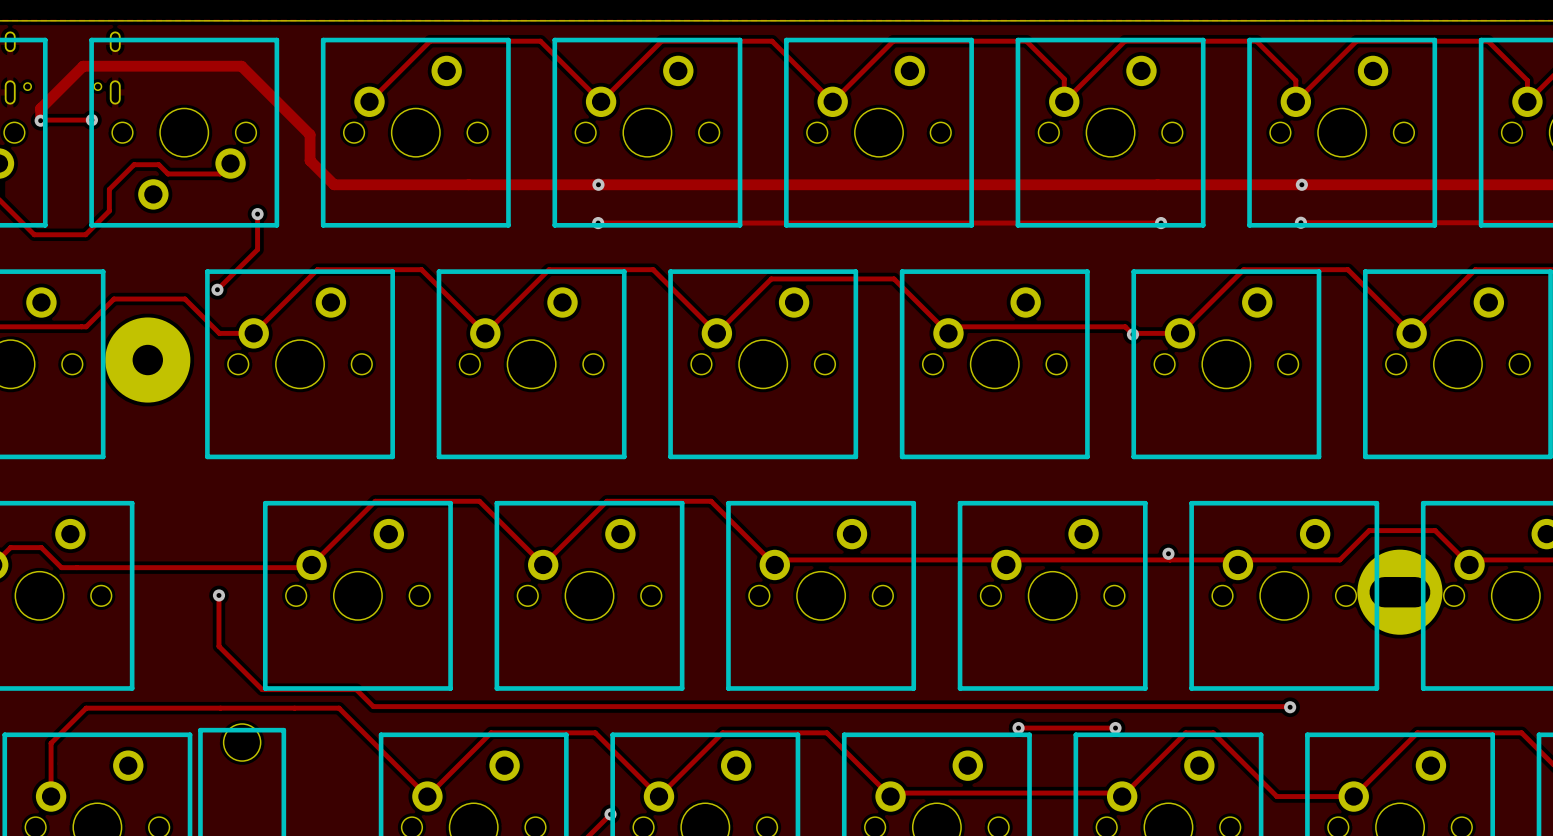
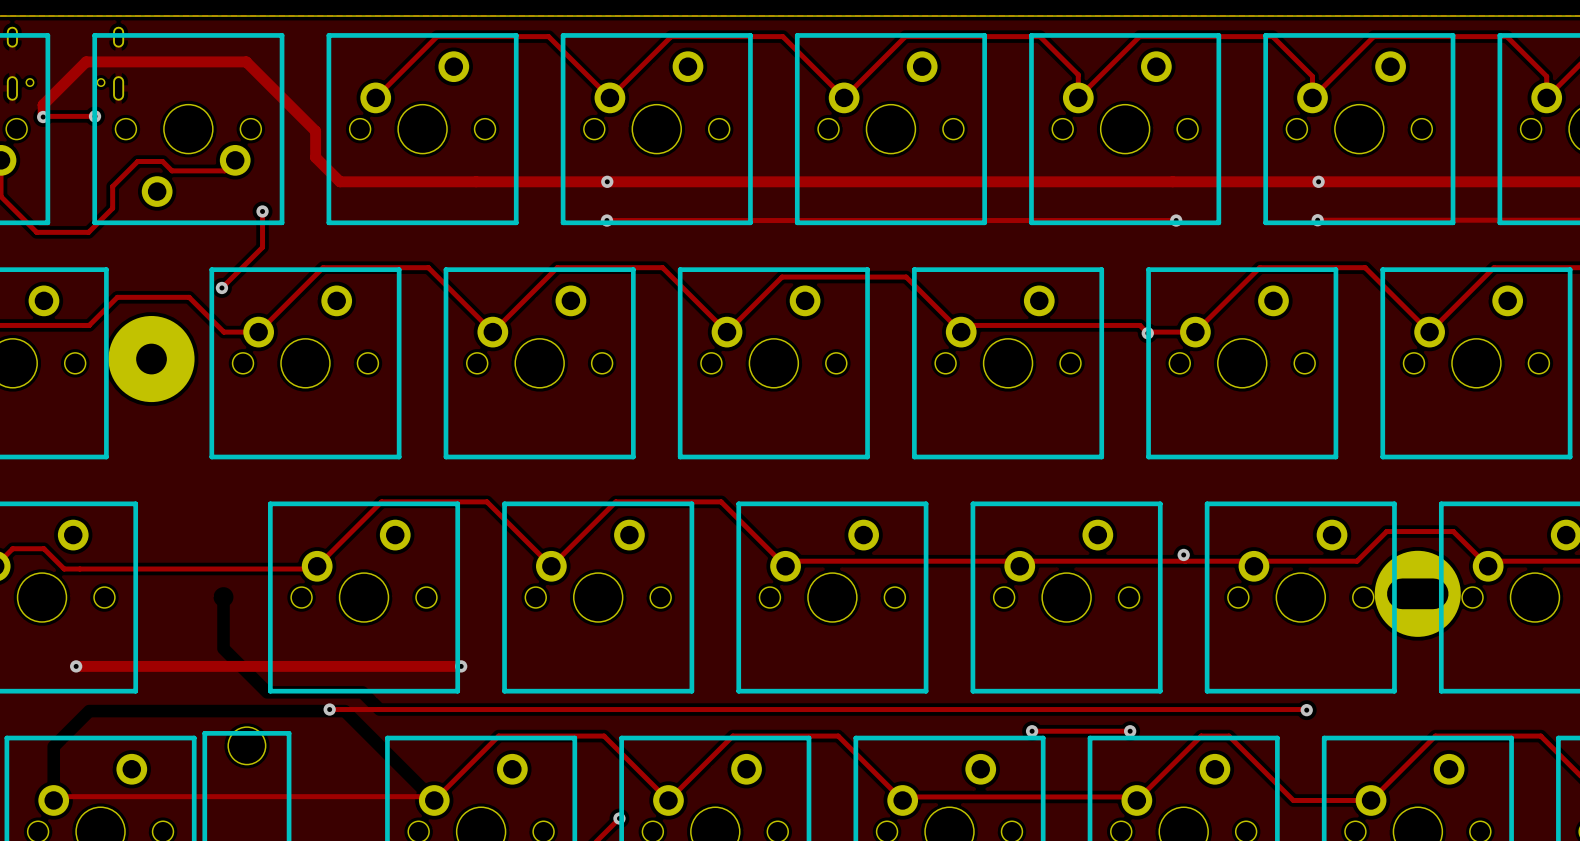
track: (218, 595) (218, 646) (262, 689) (356, 689) (373, 706) -> (329, 709) (379, 709)
via: (218, 595) -> none
track: none -> (76, 666) (461, 666)
via: none -> (76, 666)
via: none -> (461, 666)
via: none -> (329, 709)
track: (423, 792) (339, 708) (86, 708) (51, 743) (51, 795) -> (430, 796) (57, 796) (53, 800)

